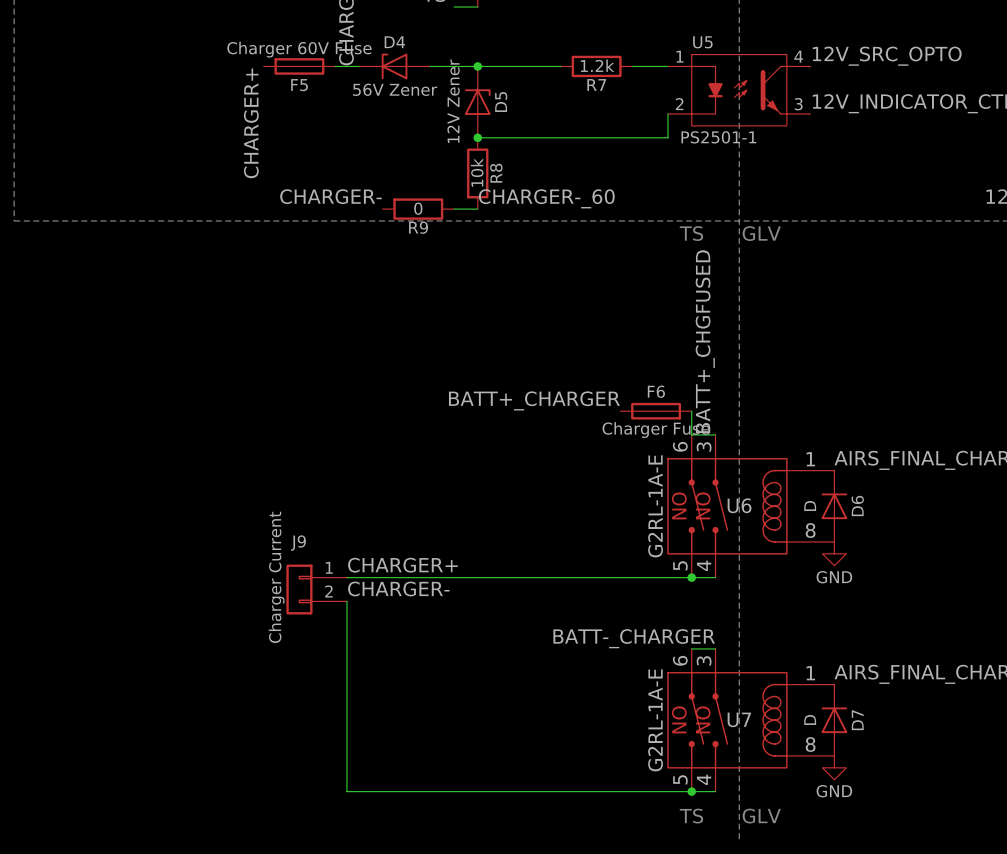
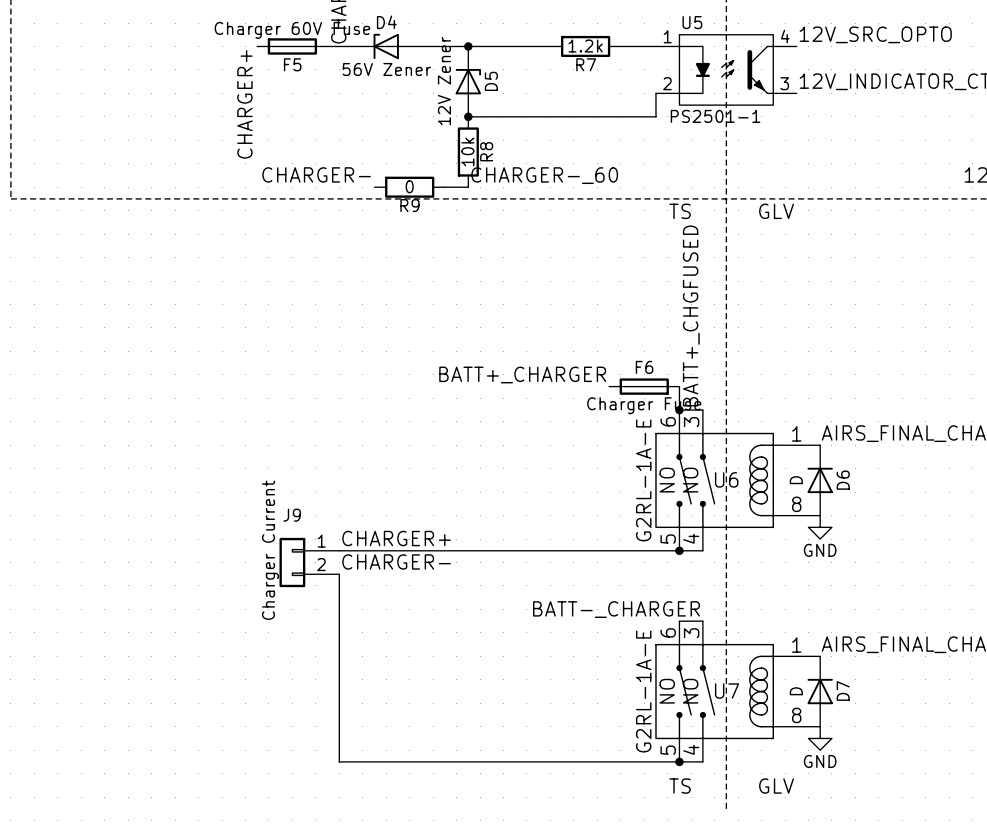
junction: none -> (679, 410)

